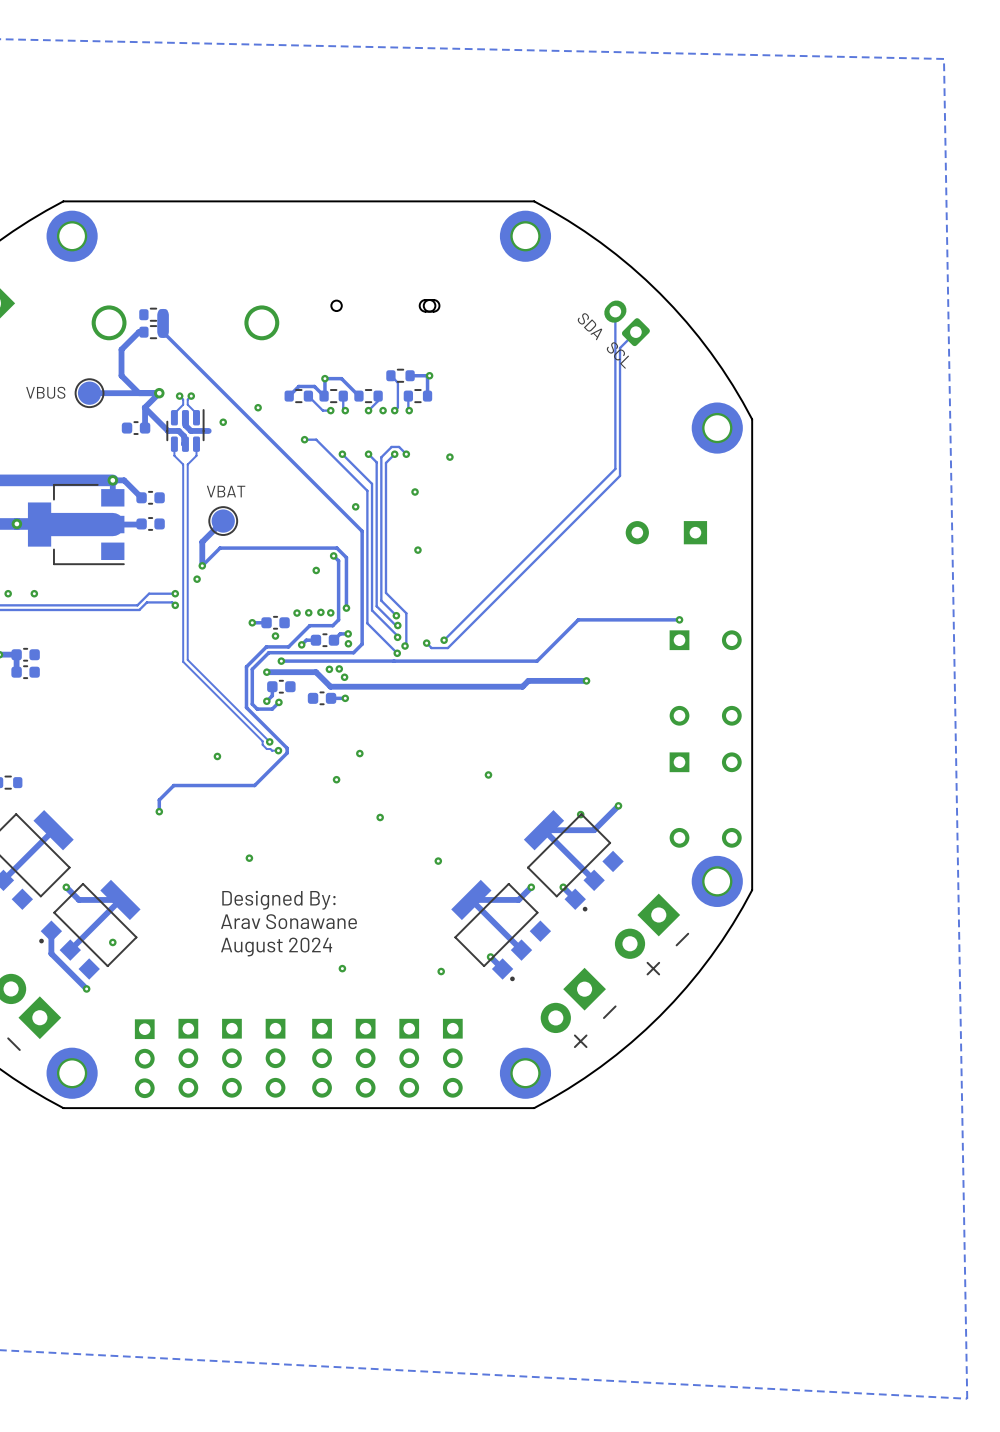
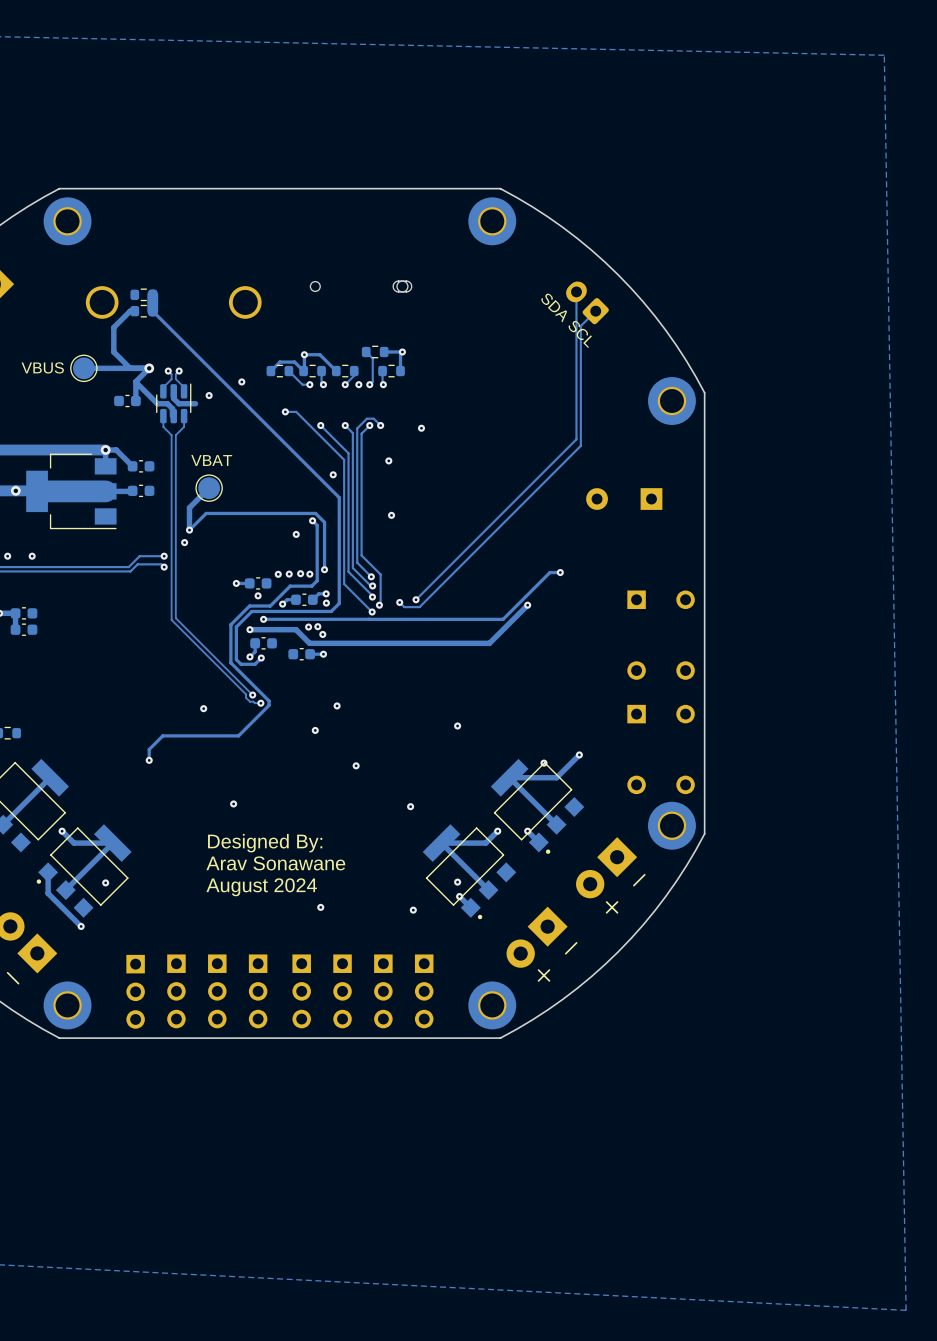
via: none -> (560, 572)
track: (679, 619) (578, 619) -> (560, 572) (549, 572) (541, 580)
via: (679, 619) -> none
via: none -> (527, 605)
track: (586, 680) (528, 680) -> (527, 605) (494, 637)
via: (586, 680) -> none
via: none -> (457, 882)

